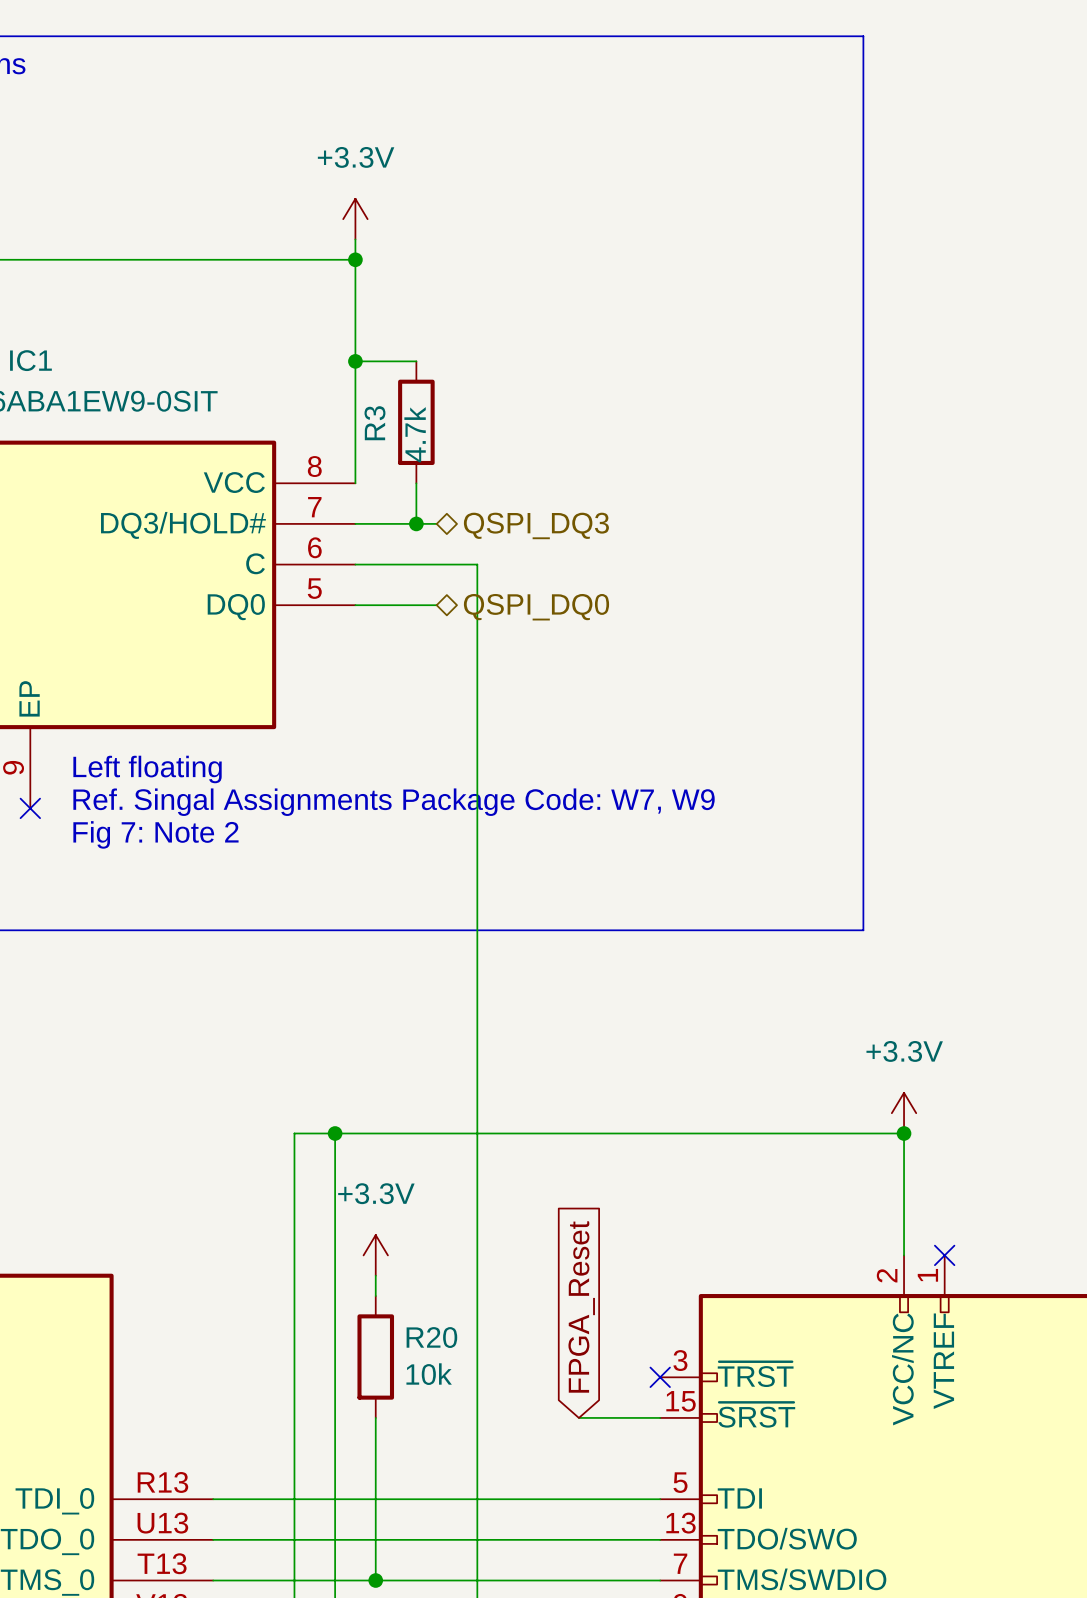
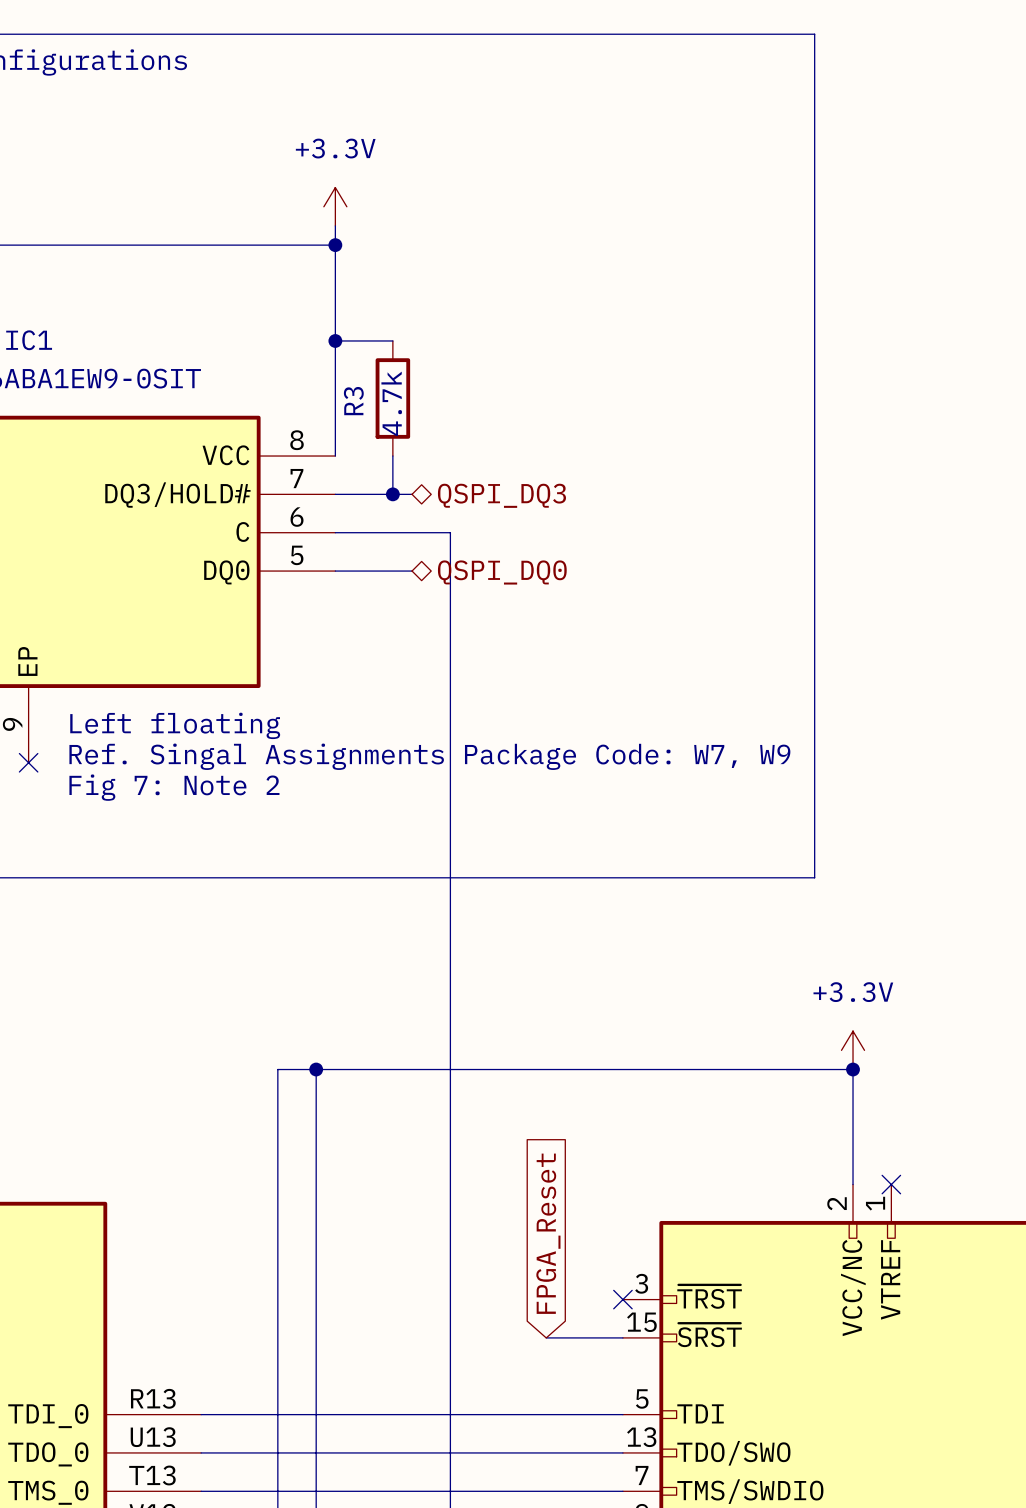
power symbol: +3.3V (375, 1255) -> none
wire: (375, 1275) (375, 1296) -> none
R20: 10k (375, 1357) -> none
wire: (375, 1417) (375, 1580) -> none
junction: (375, 1580) -> none

